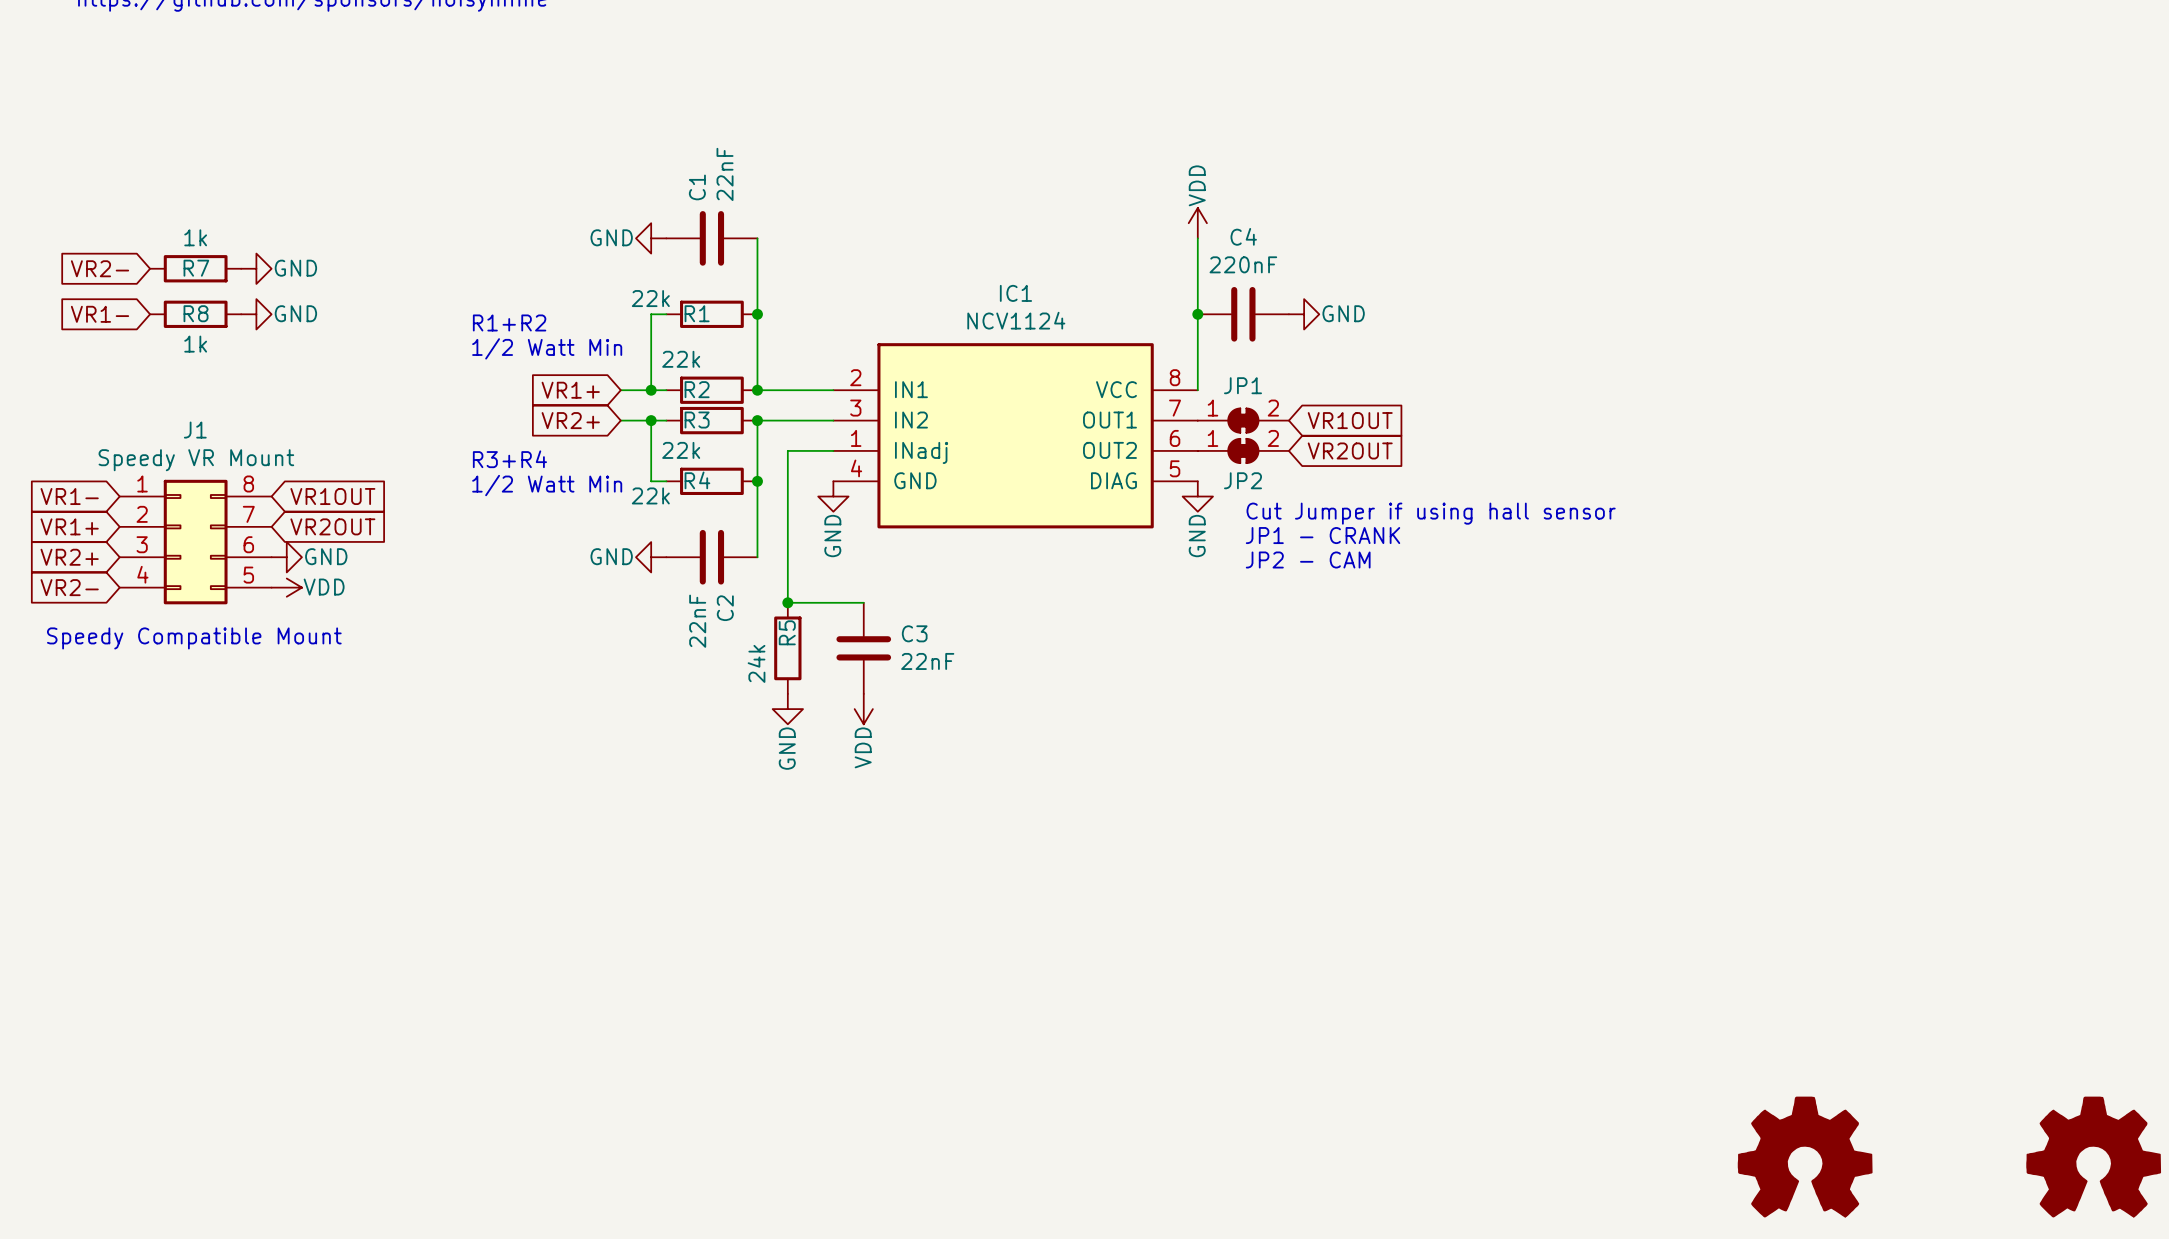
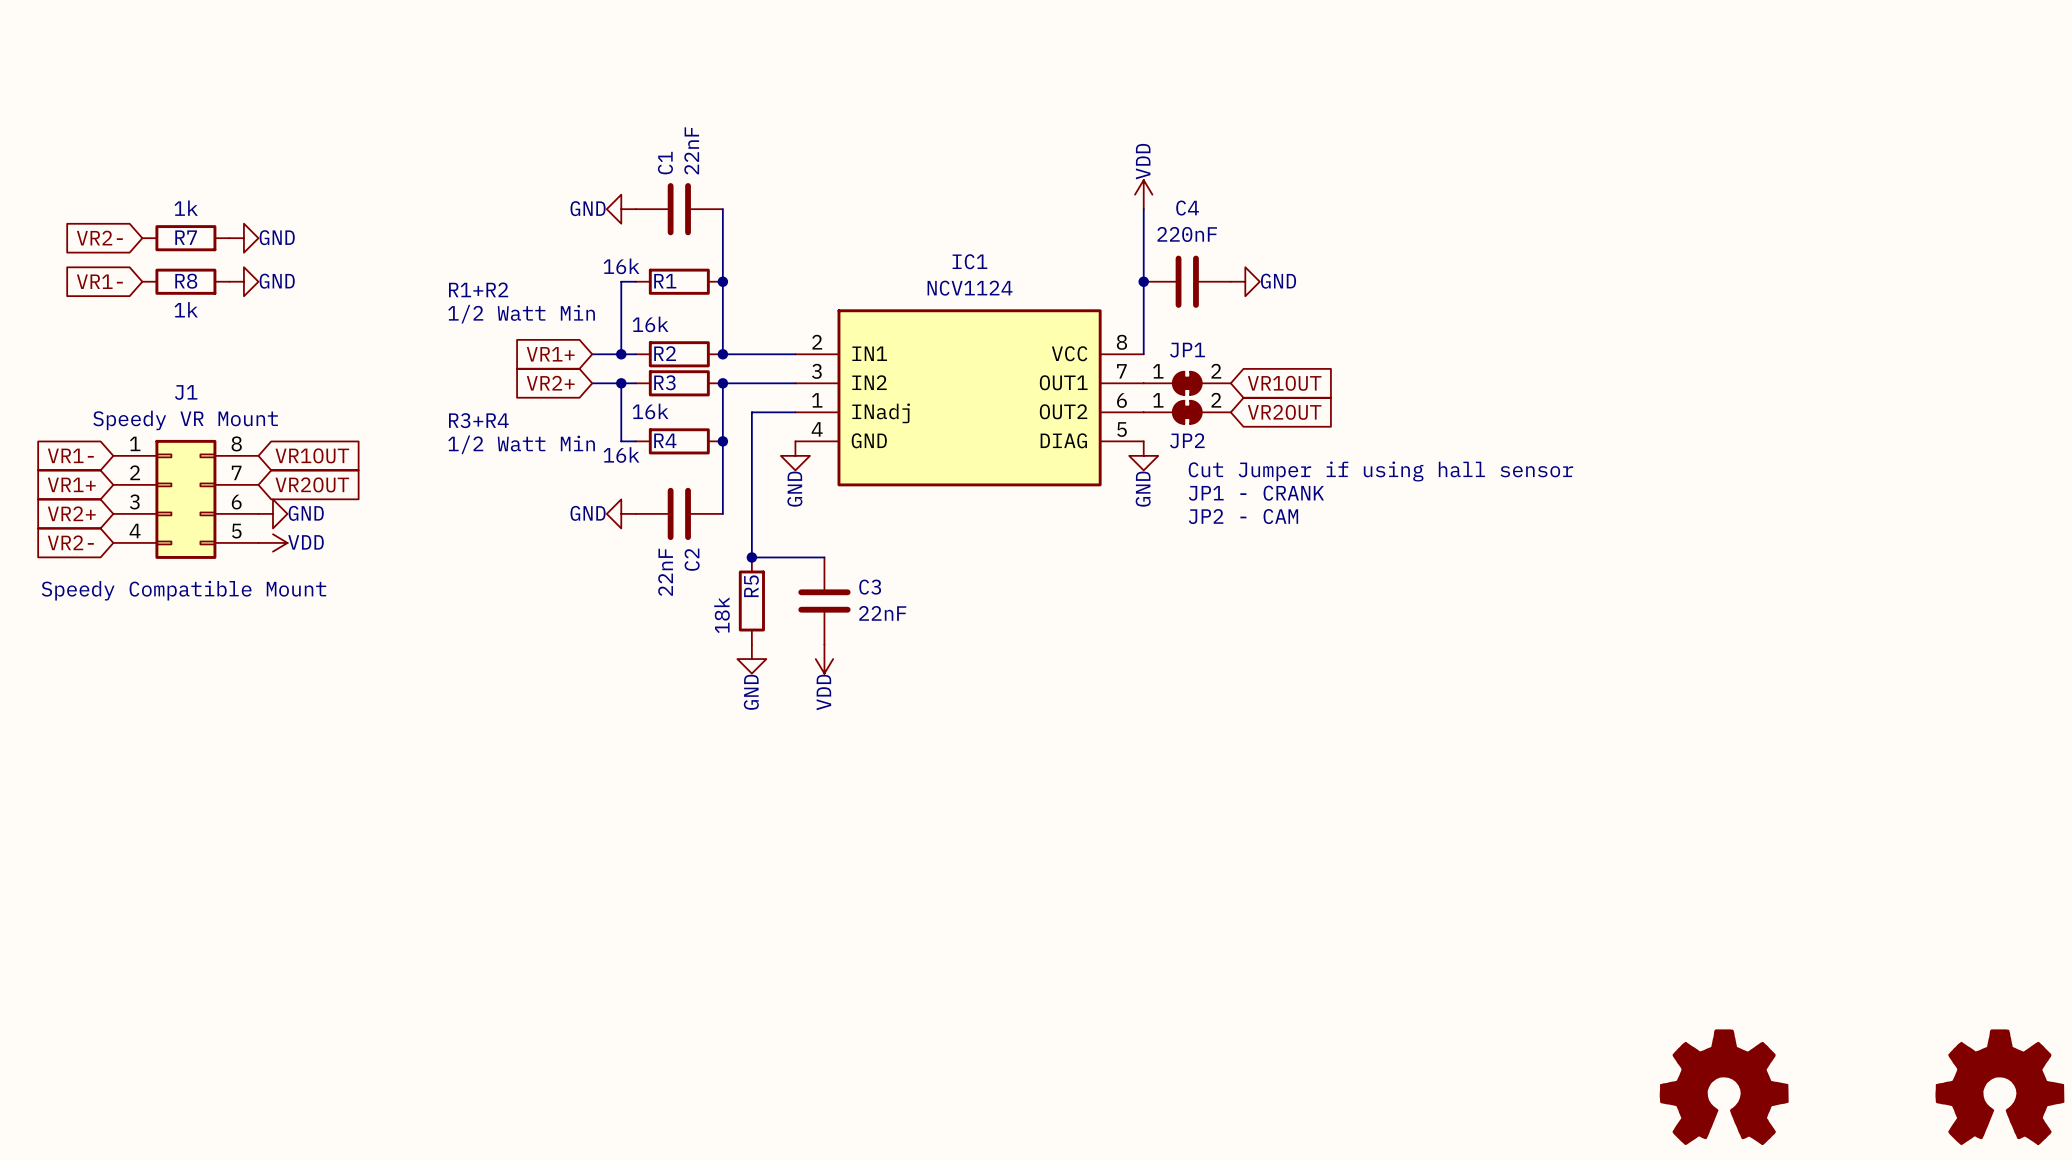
R1 value: 22k (650, 298) -> 16k (621, 266)
R2 value: 22k (681, 359) -> 16k (650, 324)
R3 value: 22k (681, 450) -> 16k (650, 411)
R4 value: 22k (650, 495) -> 16k (621, 455)
R5 value: 24k (756, 663) -> 18k (722, 615)

